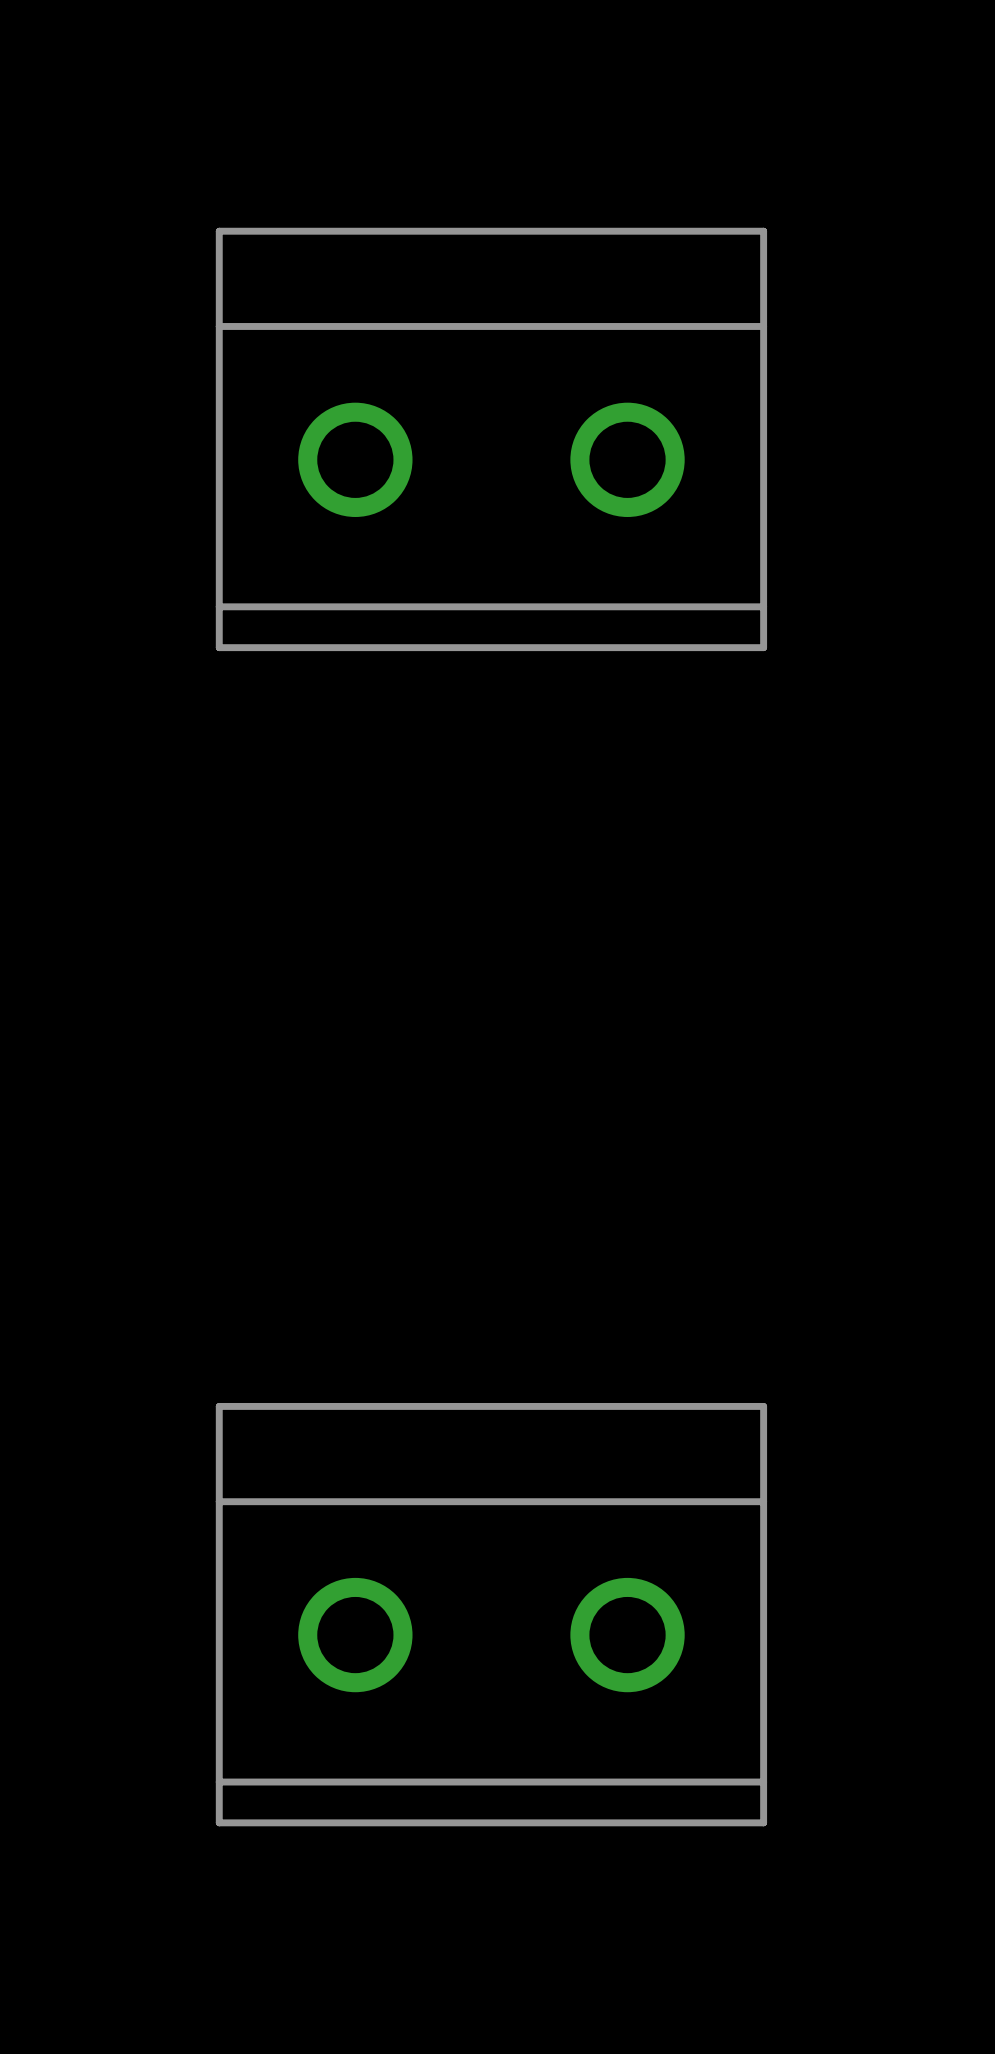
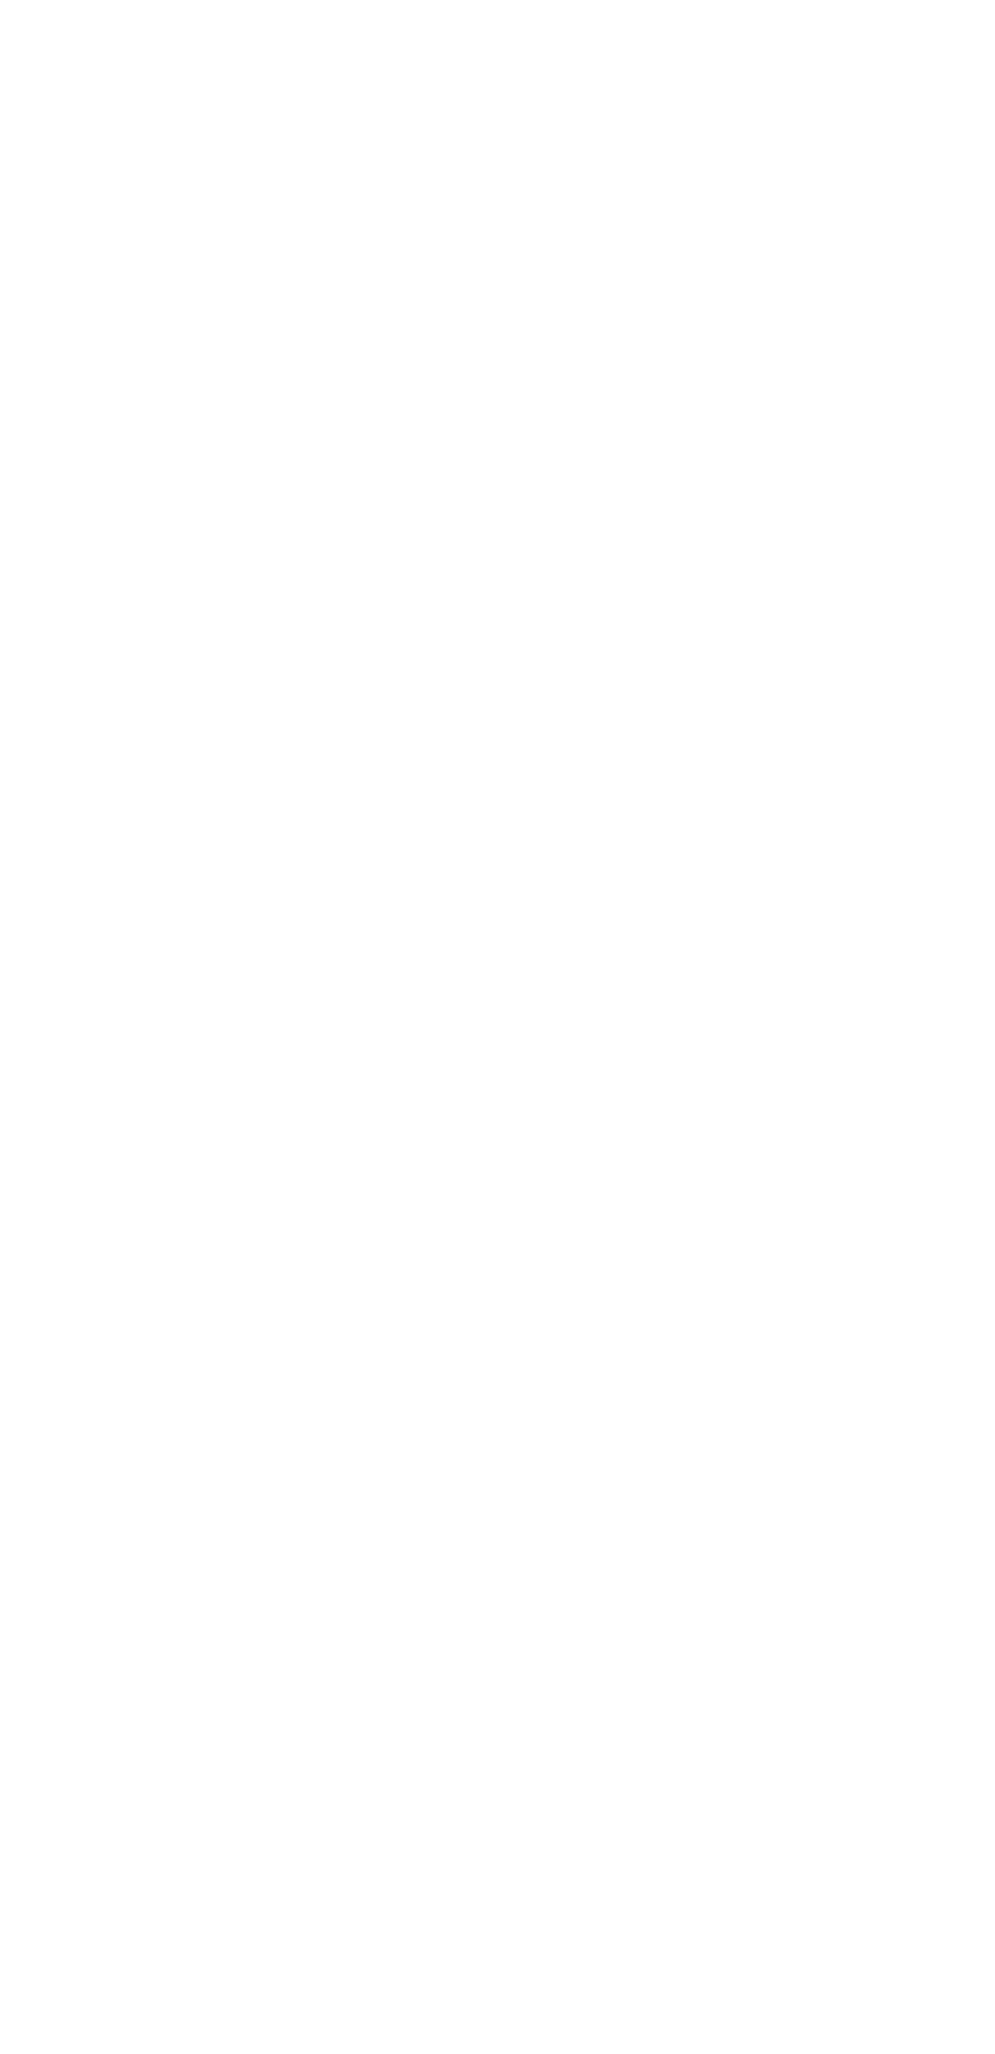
part: (491, 439) -> none
part: (491, 1614) -> none

